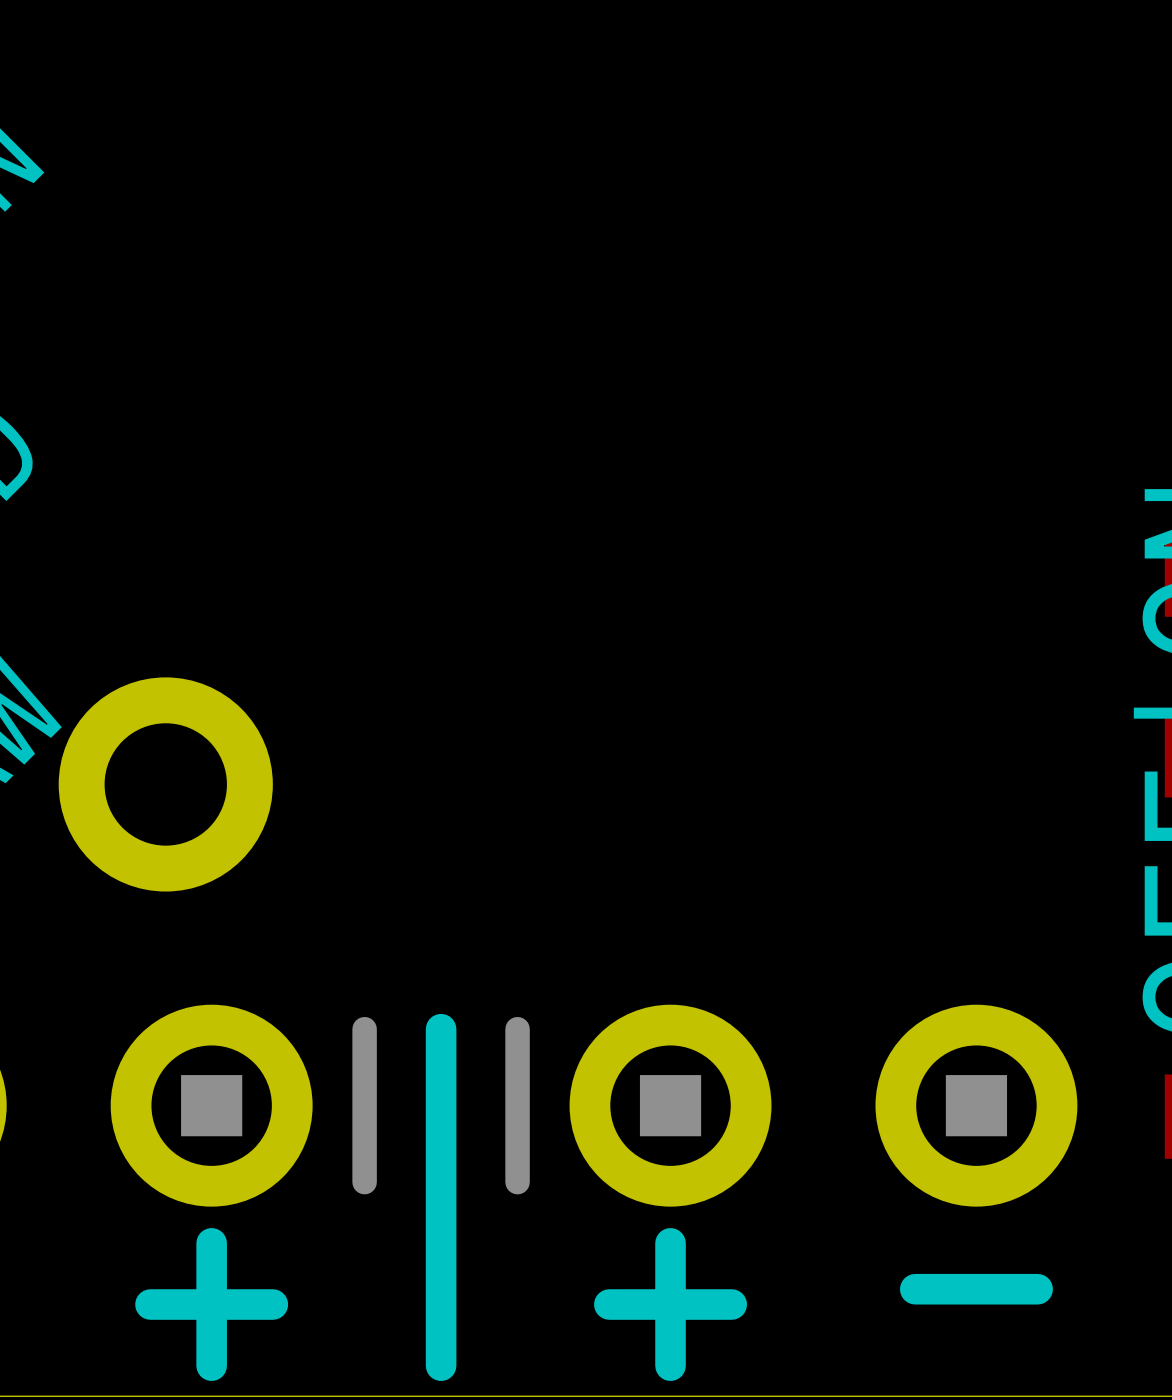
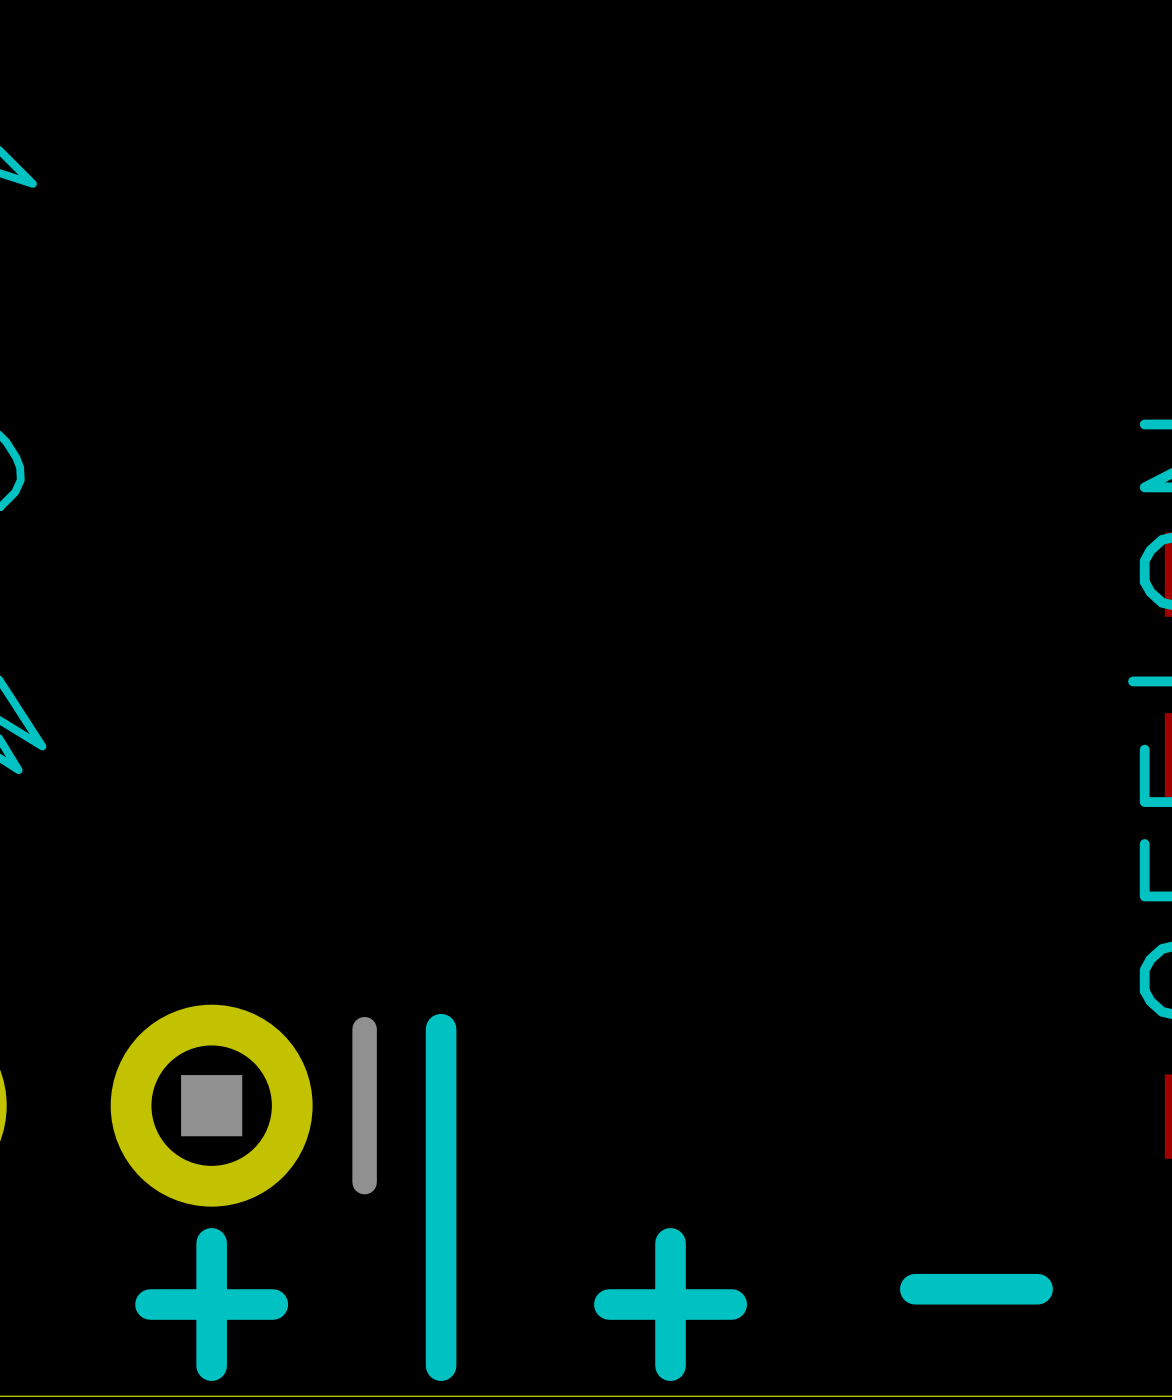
part: (165, 784) -> none
part: (791, 1105) -> none

